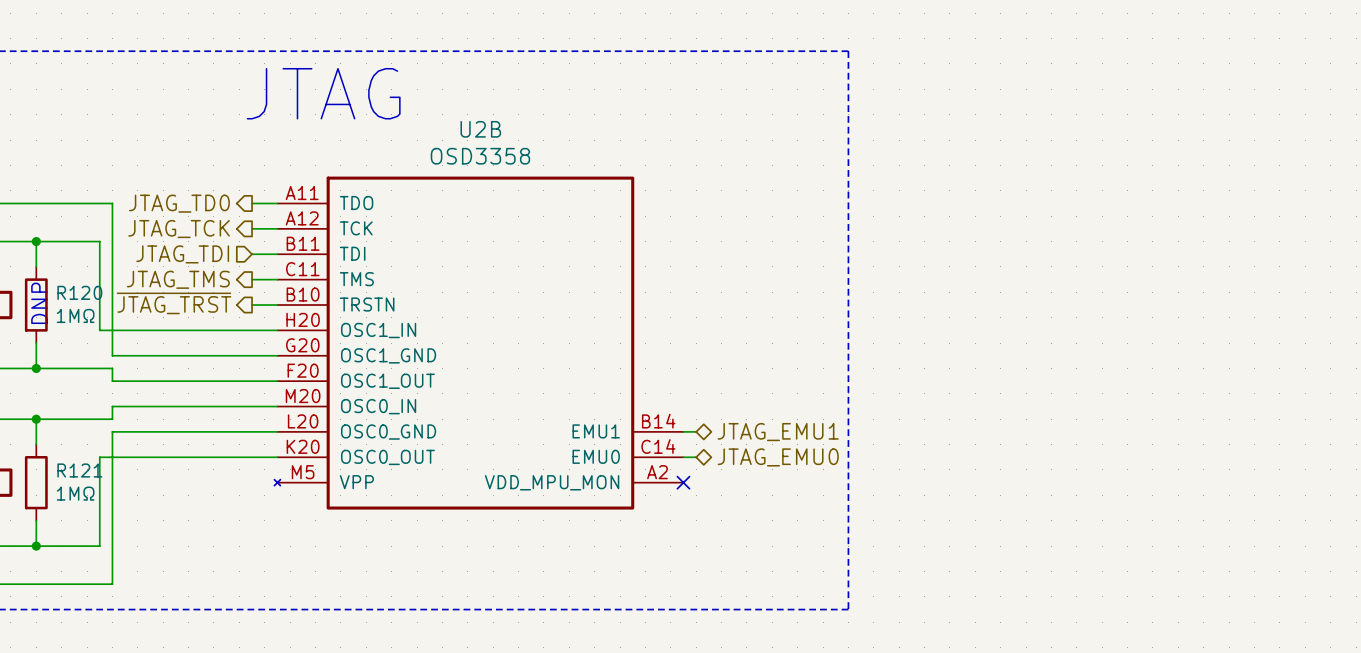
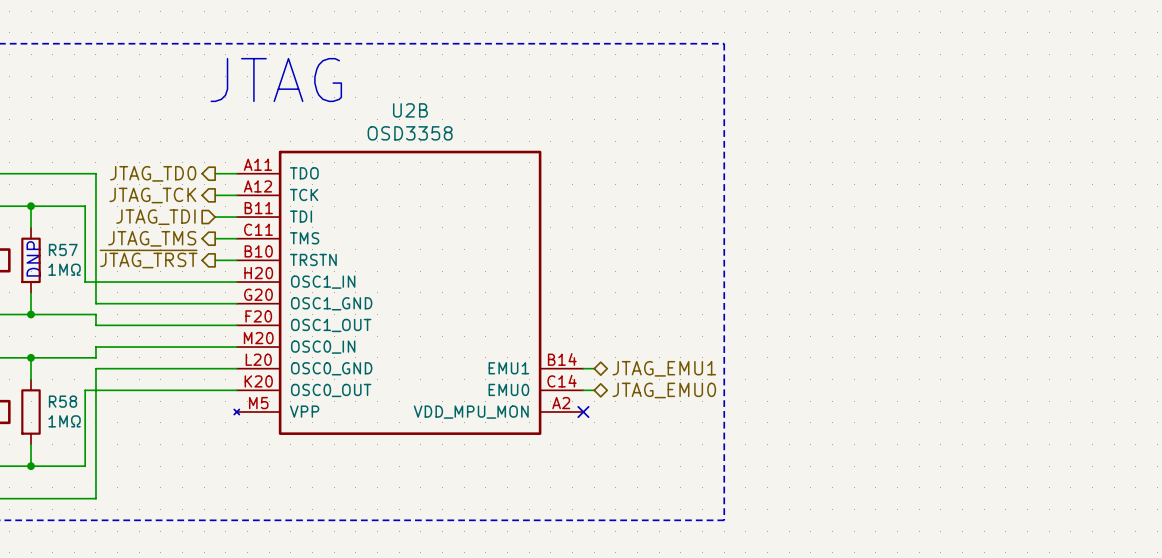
R120 name: R120 (79, 292) -> R57 (63, 249)
R121 name: R121 (79, 470) -> R58 (63, 401)

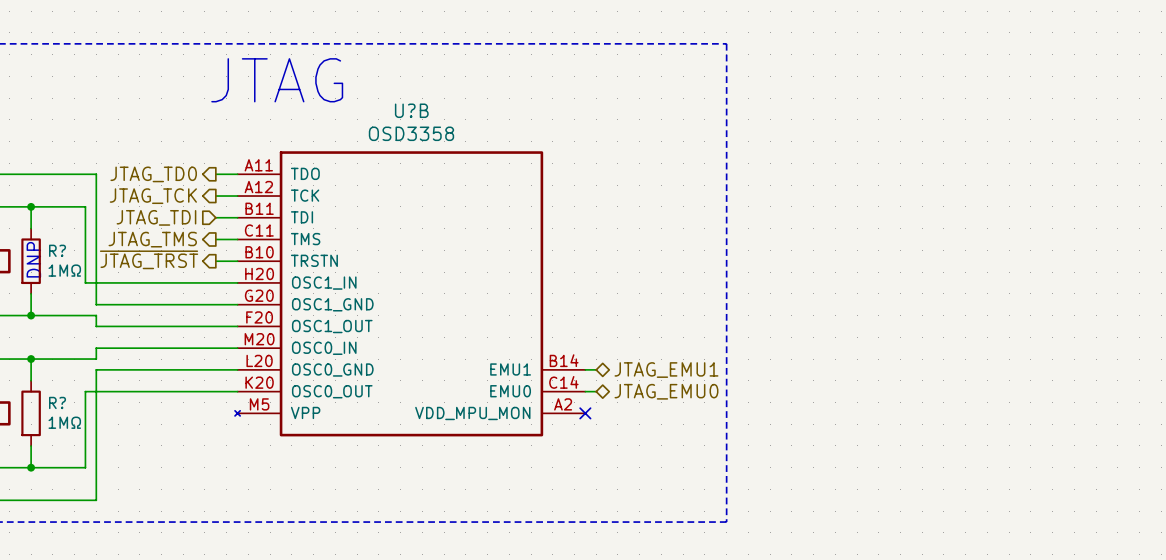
U2B name: U2B (410, 110) -> U?B (411, 110)
R57 name: R57 (63, 249) -> R? (57, 250)
R58 name: R58 (63, 401) -> R? (57, 402)

